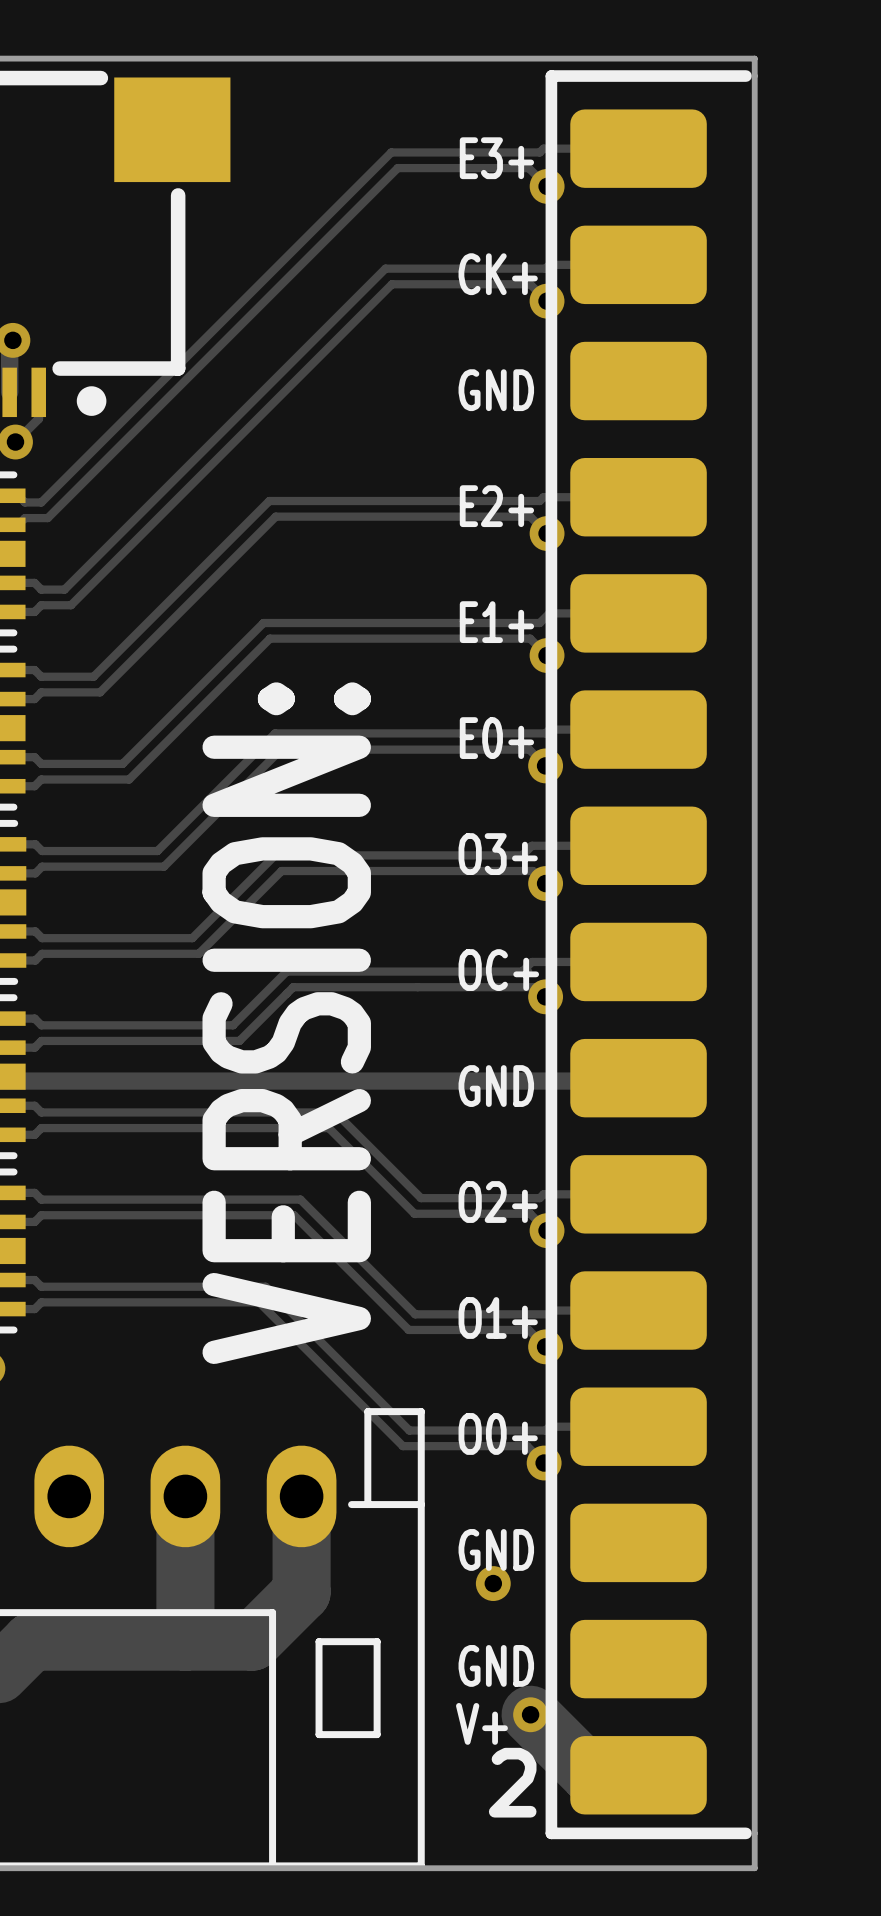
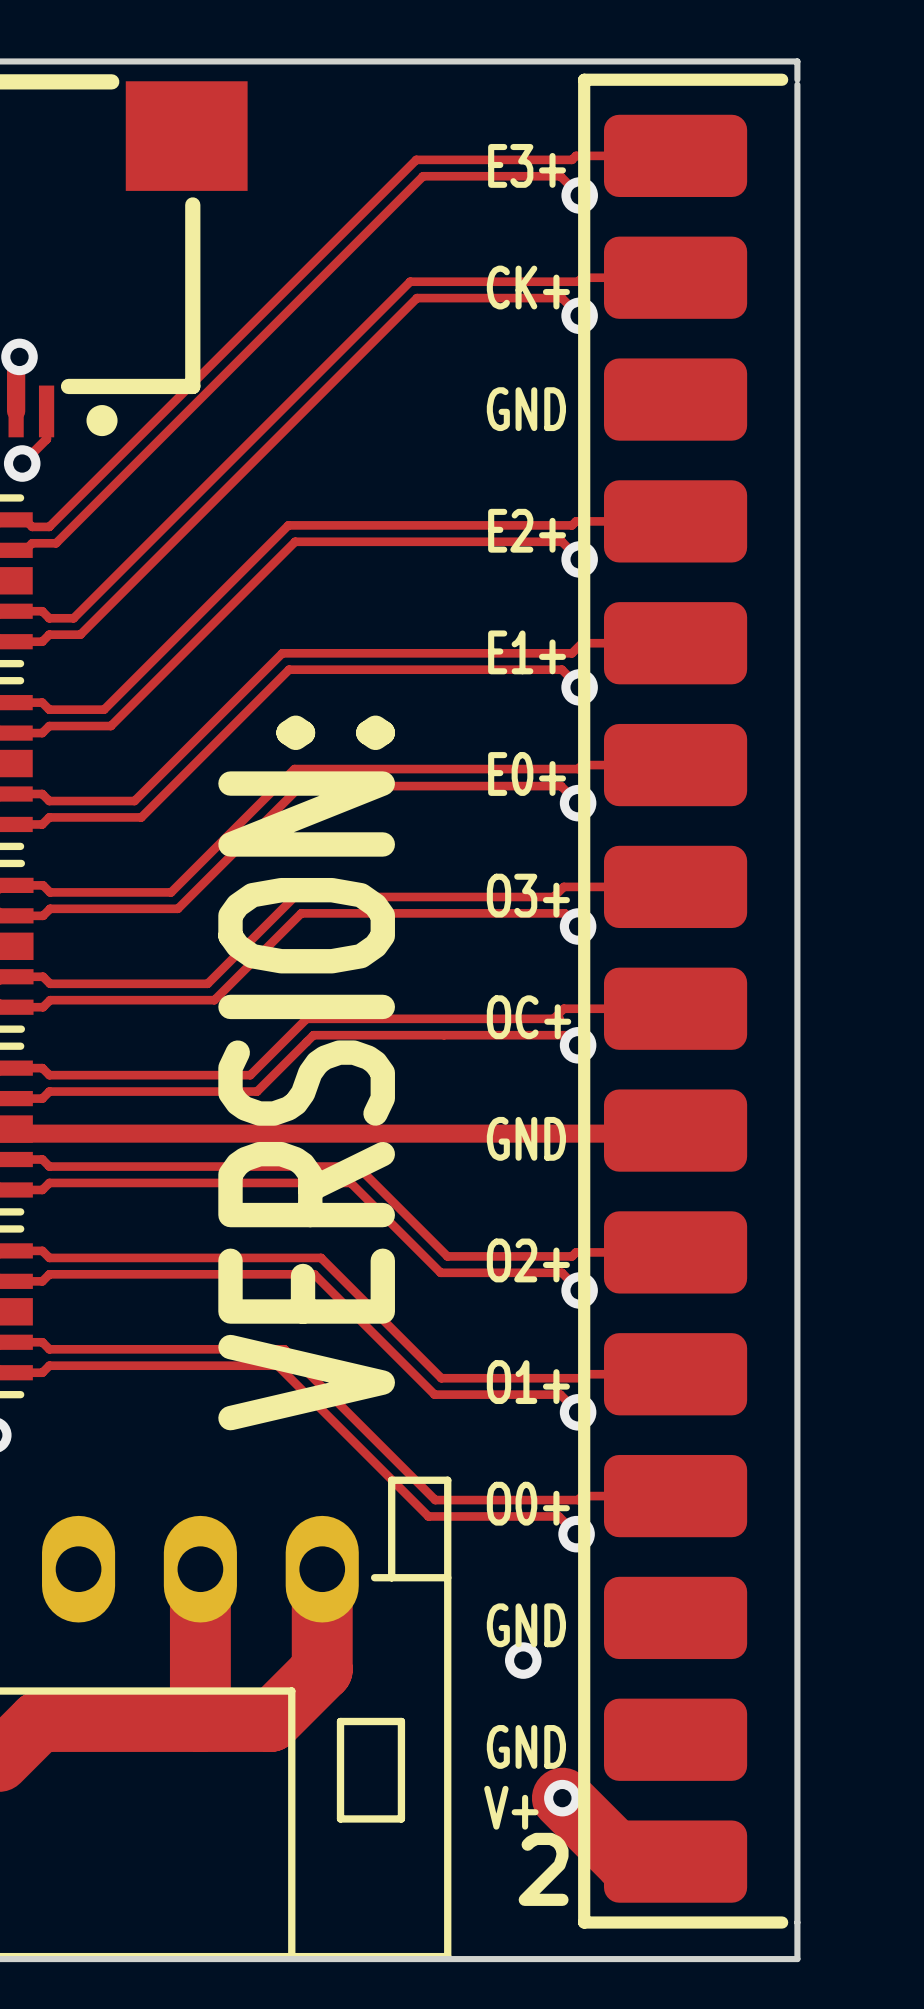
part footprint: [545, 70, 758, 1840] -> [578, 73, 801, 1929]

